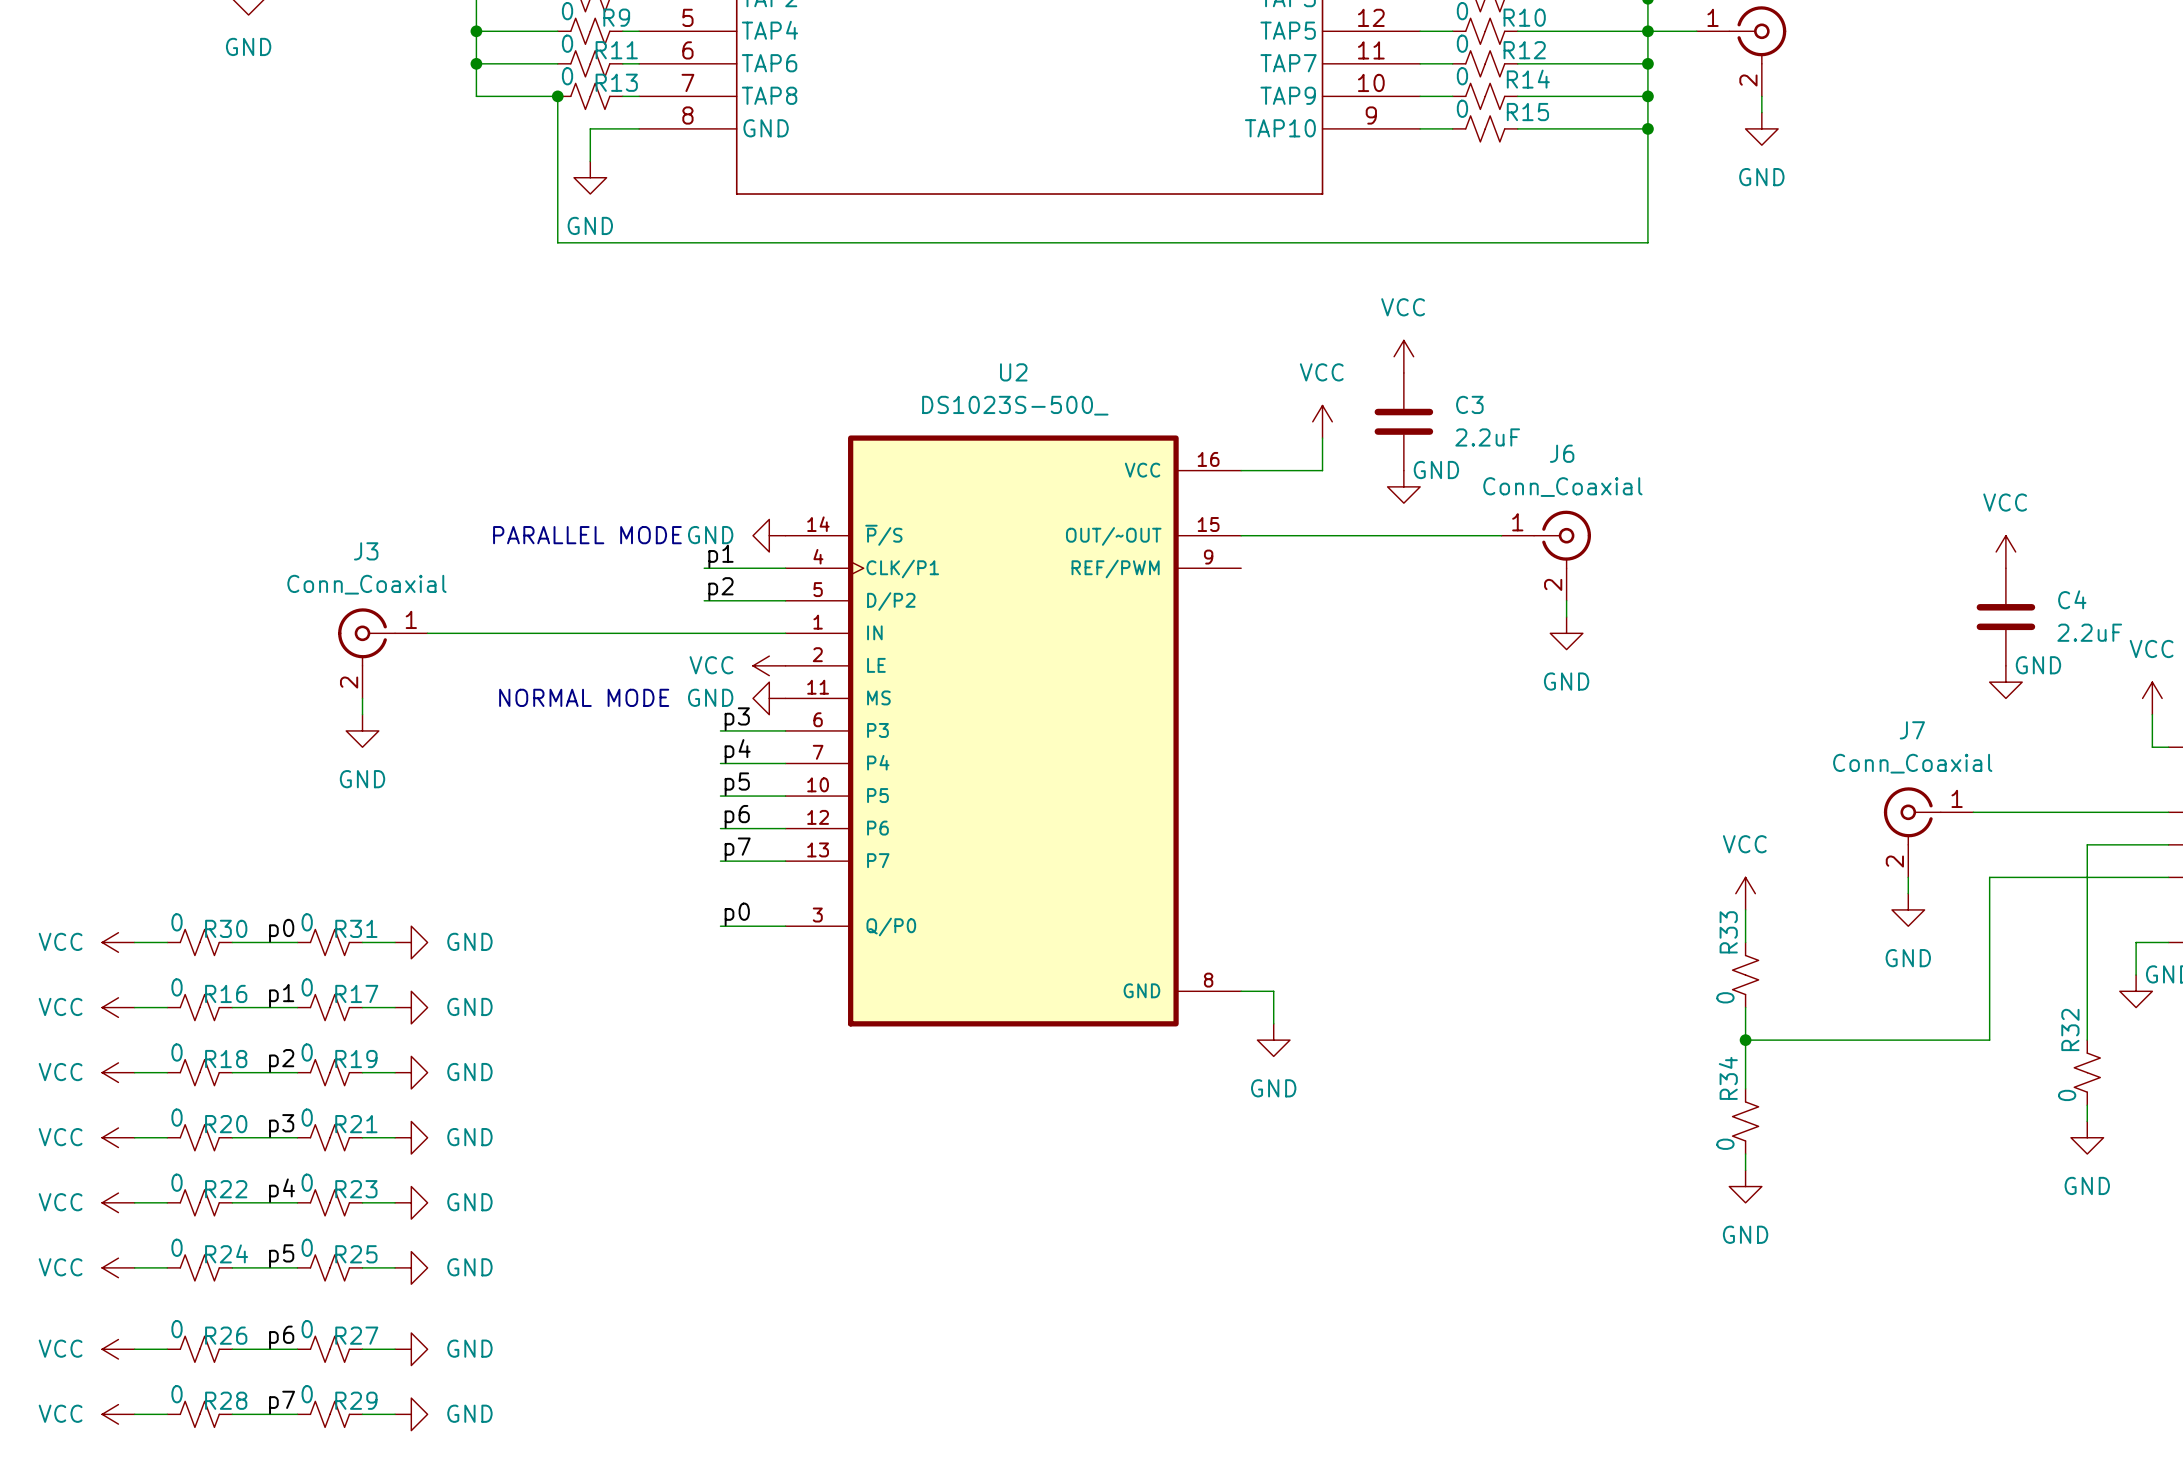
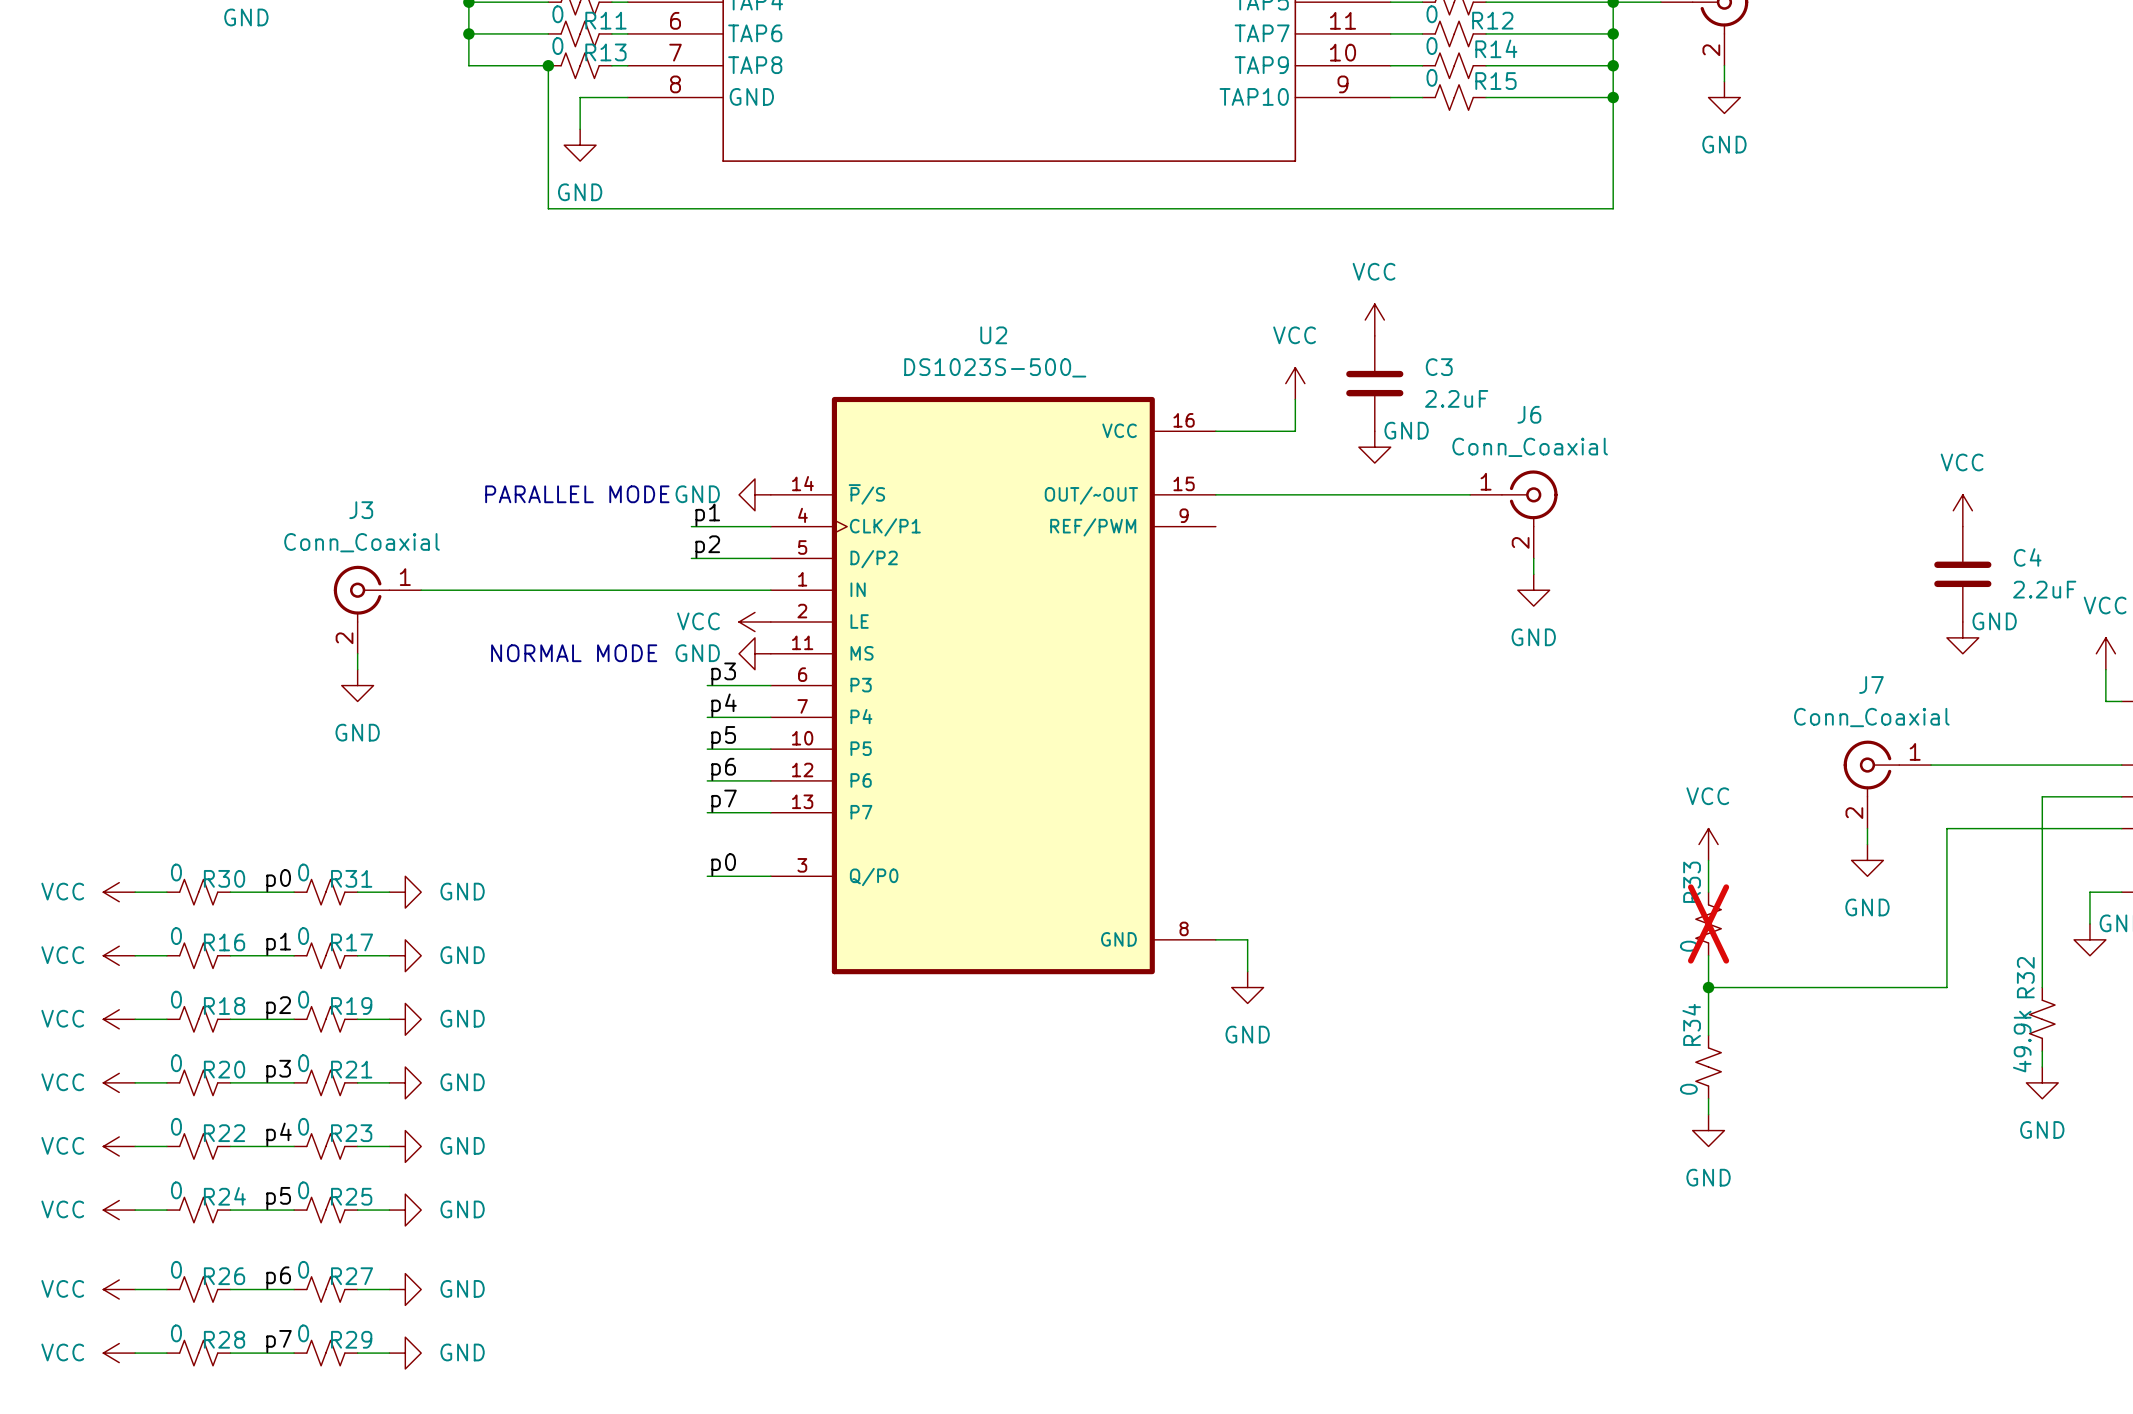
R33 do-not-place cross: none -> (1708, 923)
R32 value: 0 (2067, 1095) -> 49.9k (2022, 1041)

